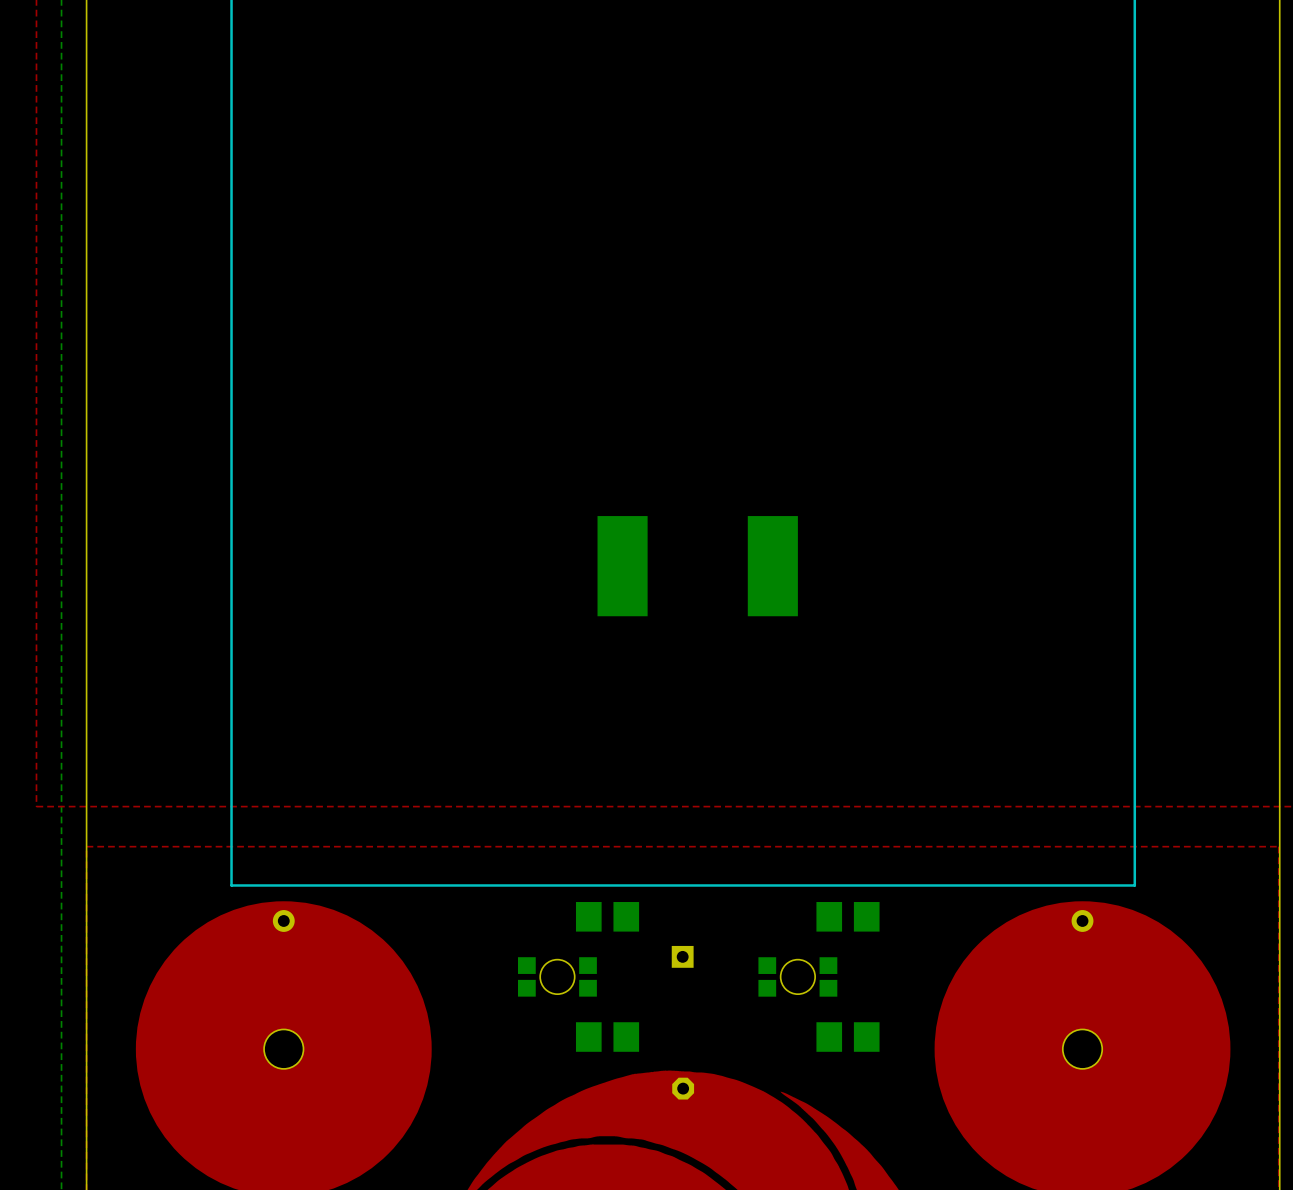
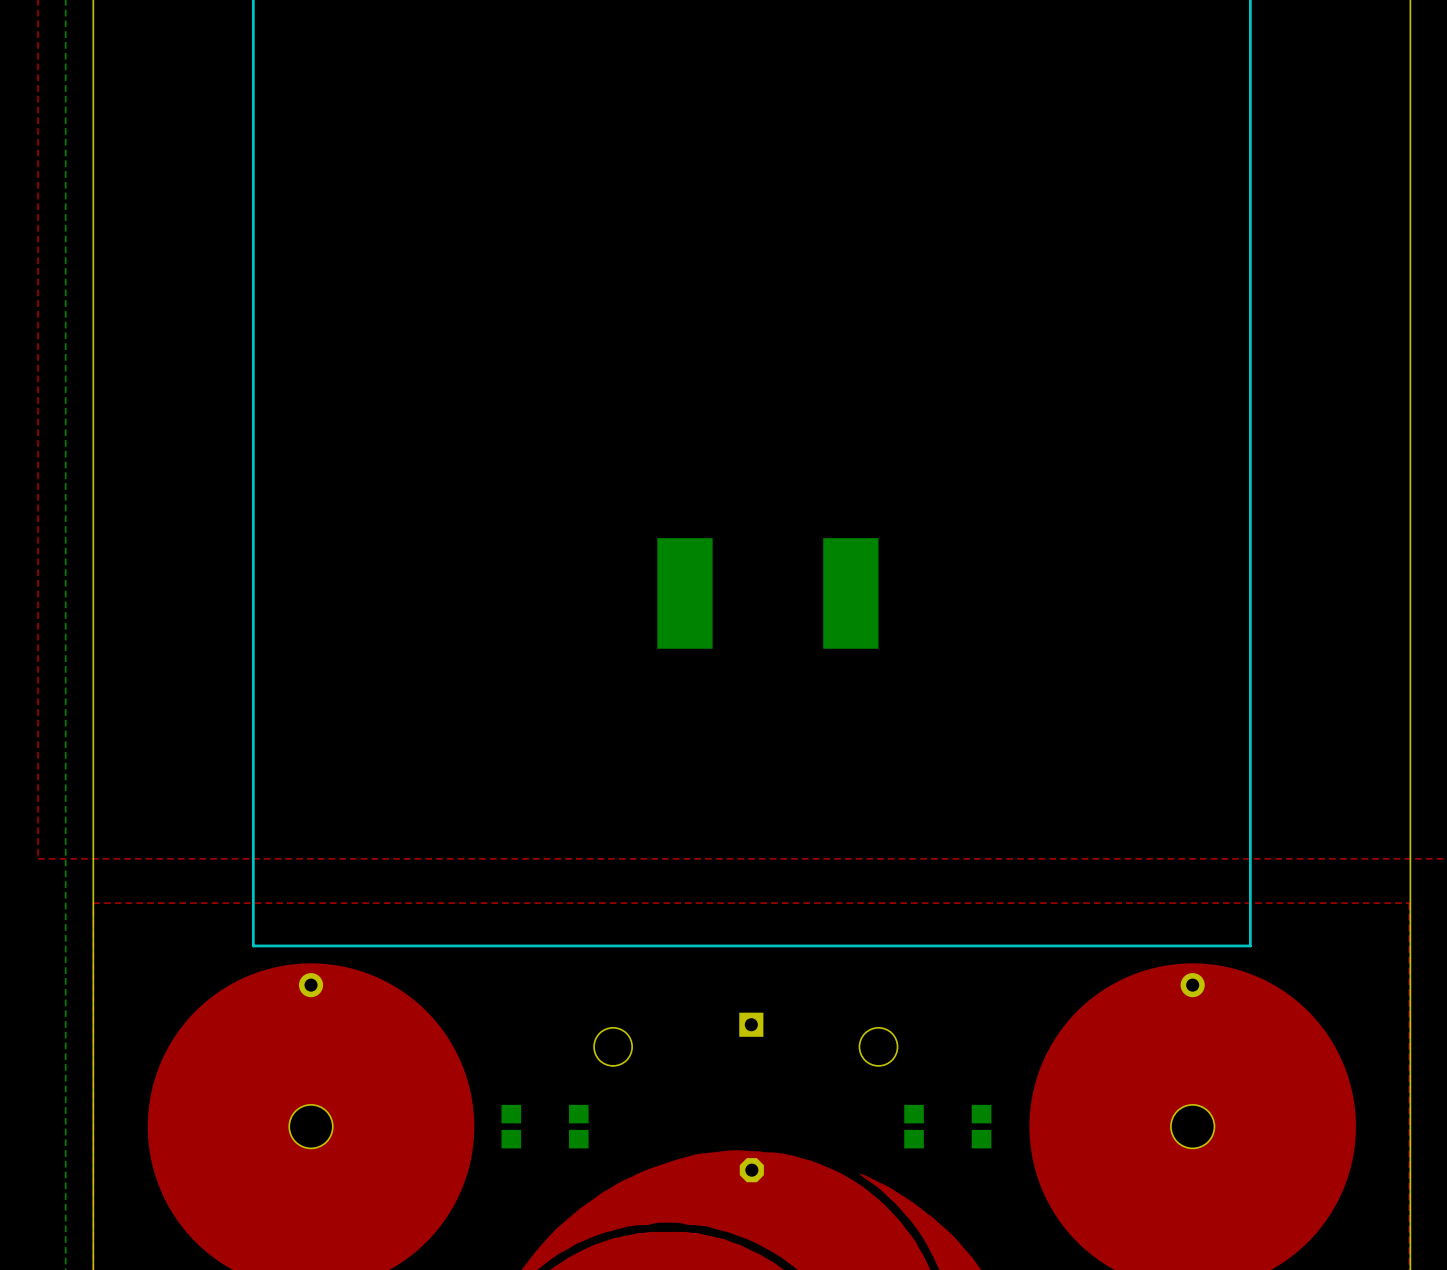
part: (607, 916) -> none
part: (847, 916) -> none
part position: (557, 976) -> (545, 1126)
part: (797, 976) -> none
part footprint: [816, 1022, 880, 1052] -> [904, 1104, 992, 1149]
part: (607, 1037) -> none

